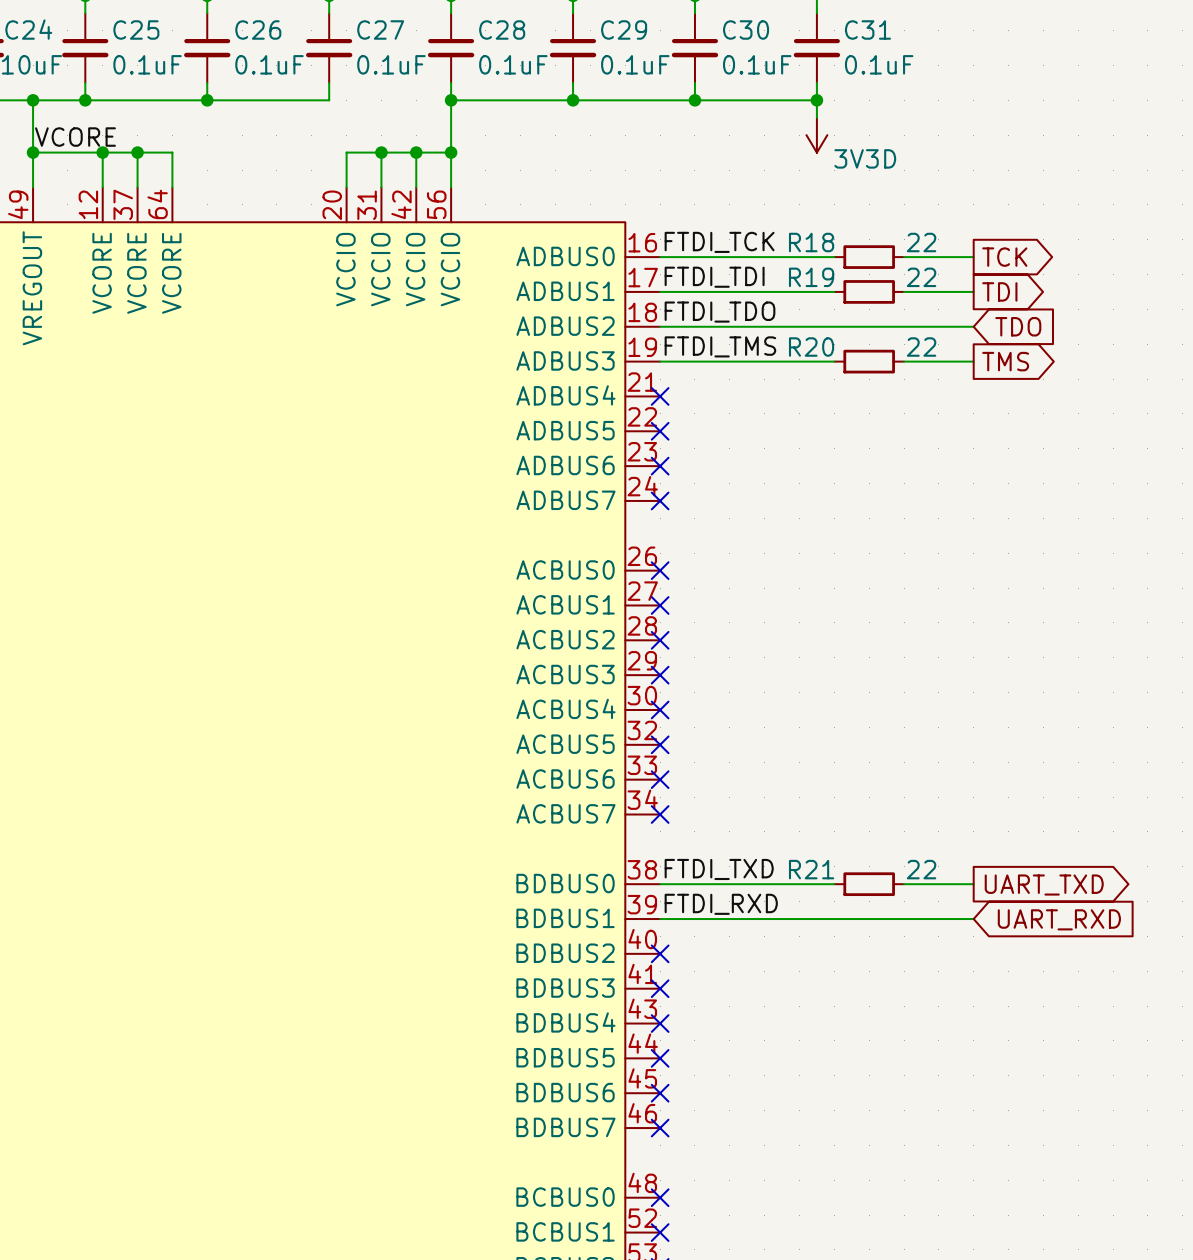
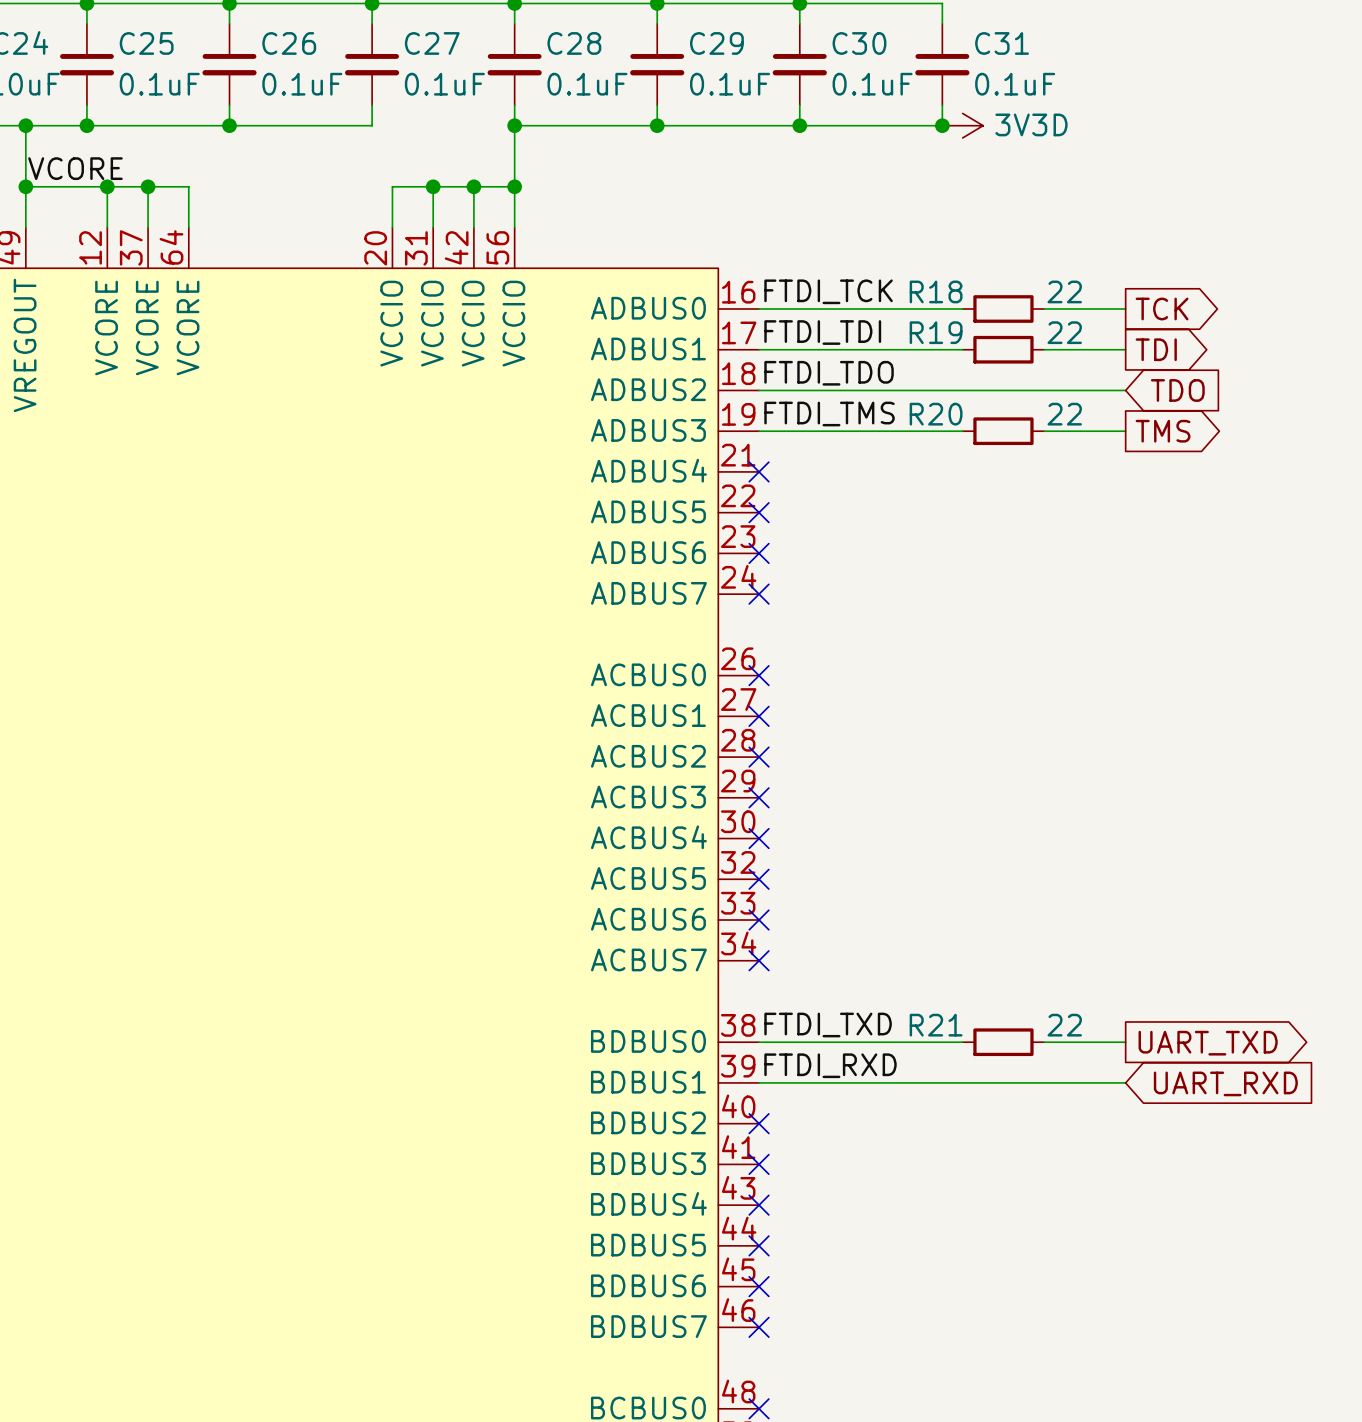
wire: (816, 100) (816, 117) -> none
power symbol rotation: 0° (816, 135) -> 90° counterclockwise (962, 125)
power symbol position: 3V3D (816, 135) -> 3V3D (962, 125)

